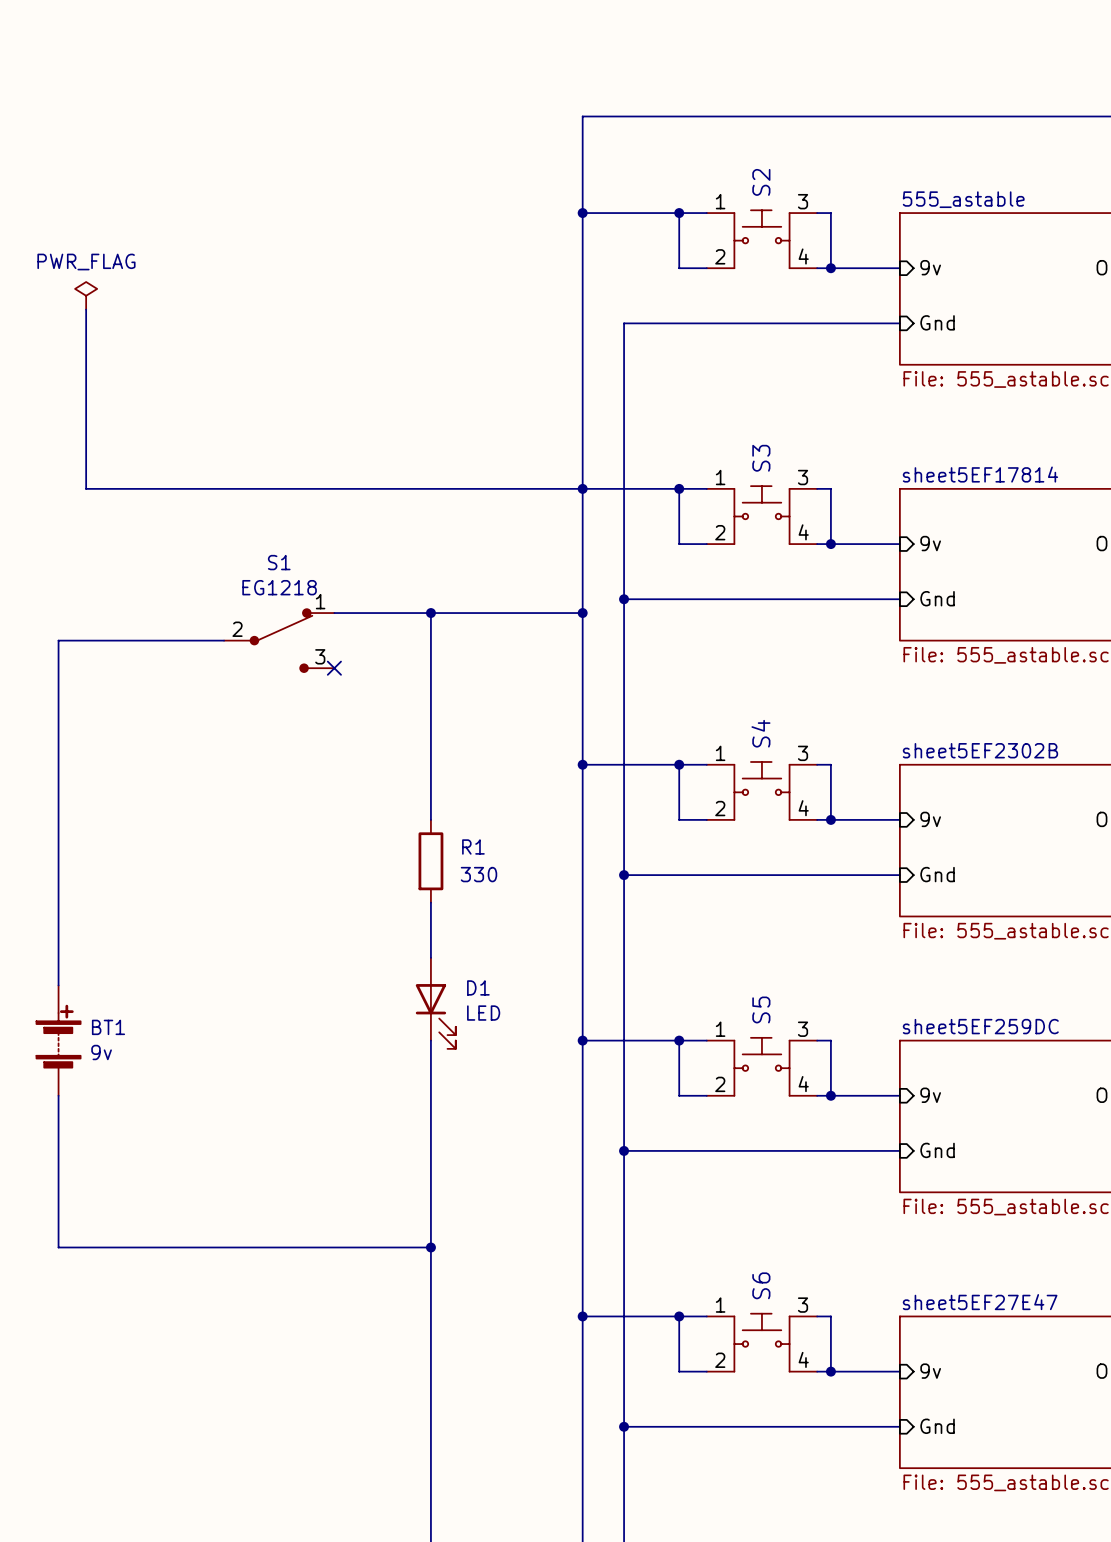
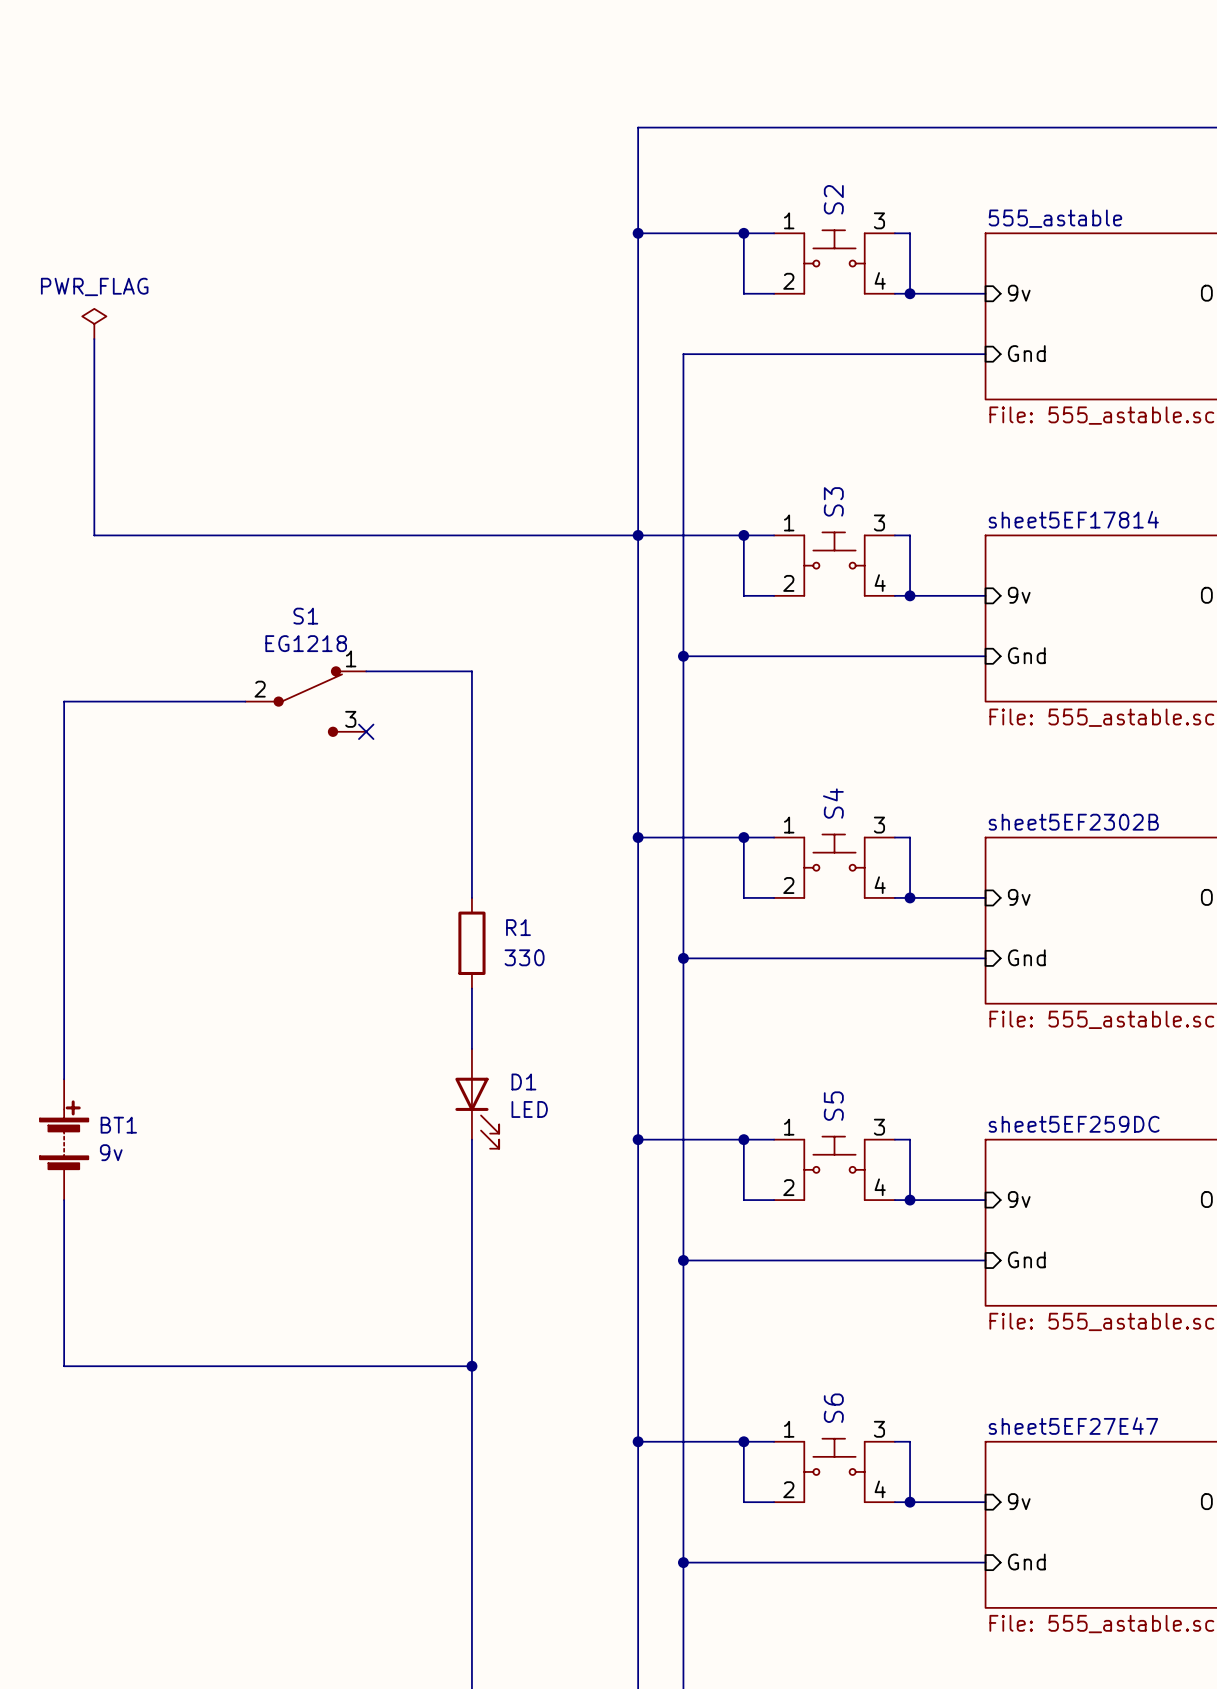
wire: (430, 613) (582, 613) -> none
junction: (430, 613) -> none
junction: (582, 613) -> none

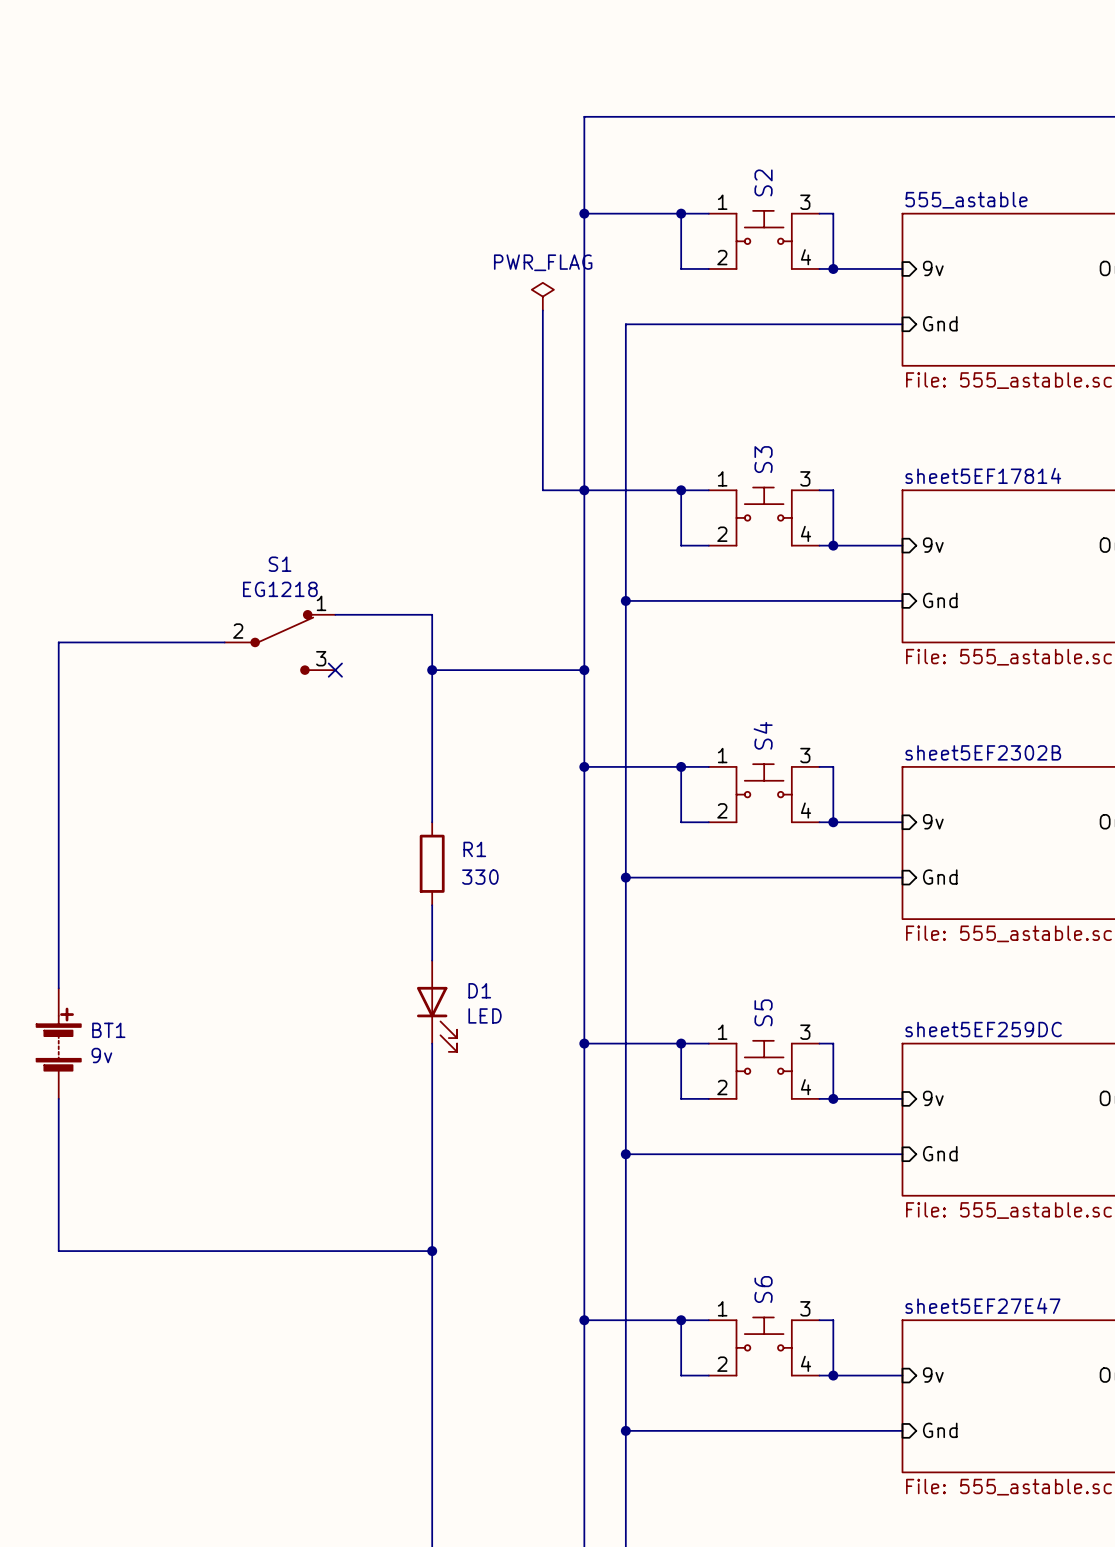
power symbol: PWR_FLAG (94, 323) -> none
power symbol: none -> PWR_FLAG (542, 296)
wire: (94, 339) (94, 535) (592, 535) -> (542, 310) (542, 490)
wire: none -> (432, 670) (584, 670)
junction: none -> (432, 670)
junction: none -> (584, 670)

